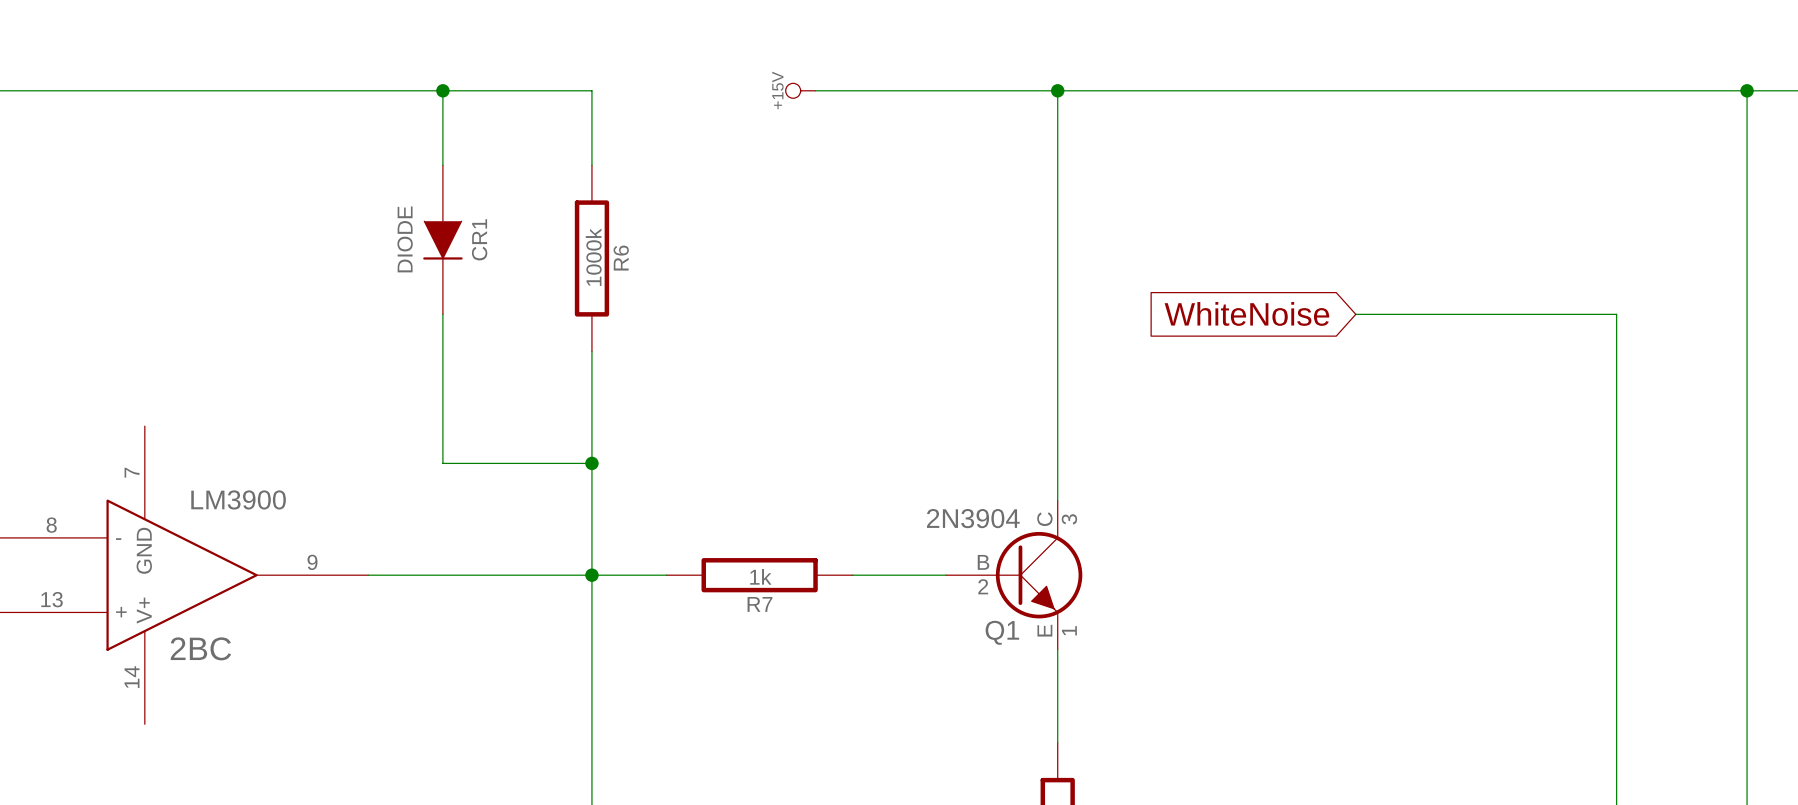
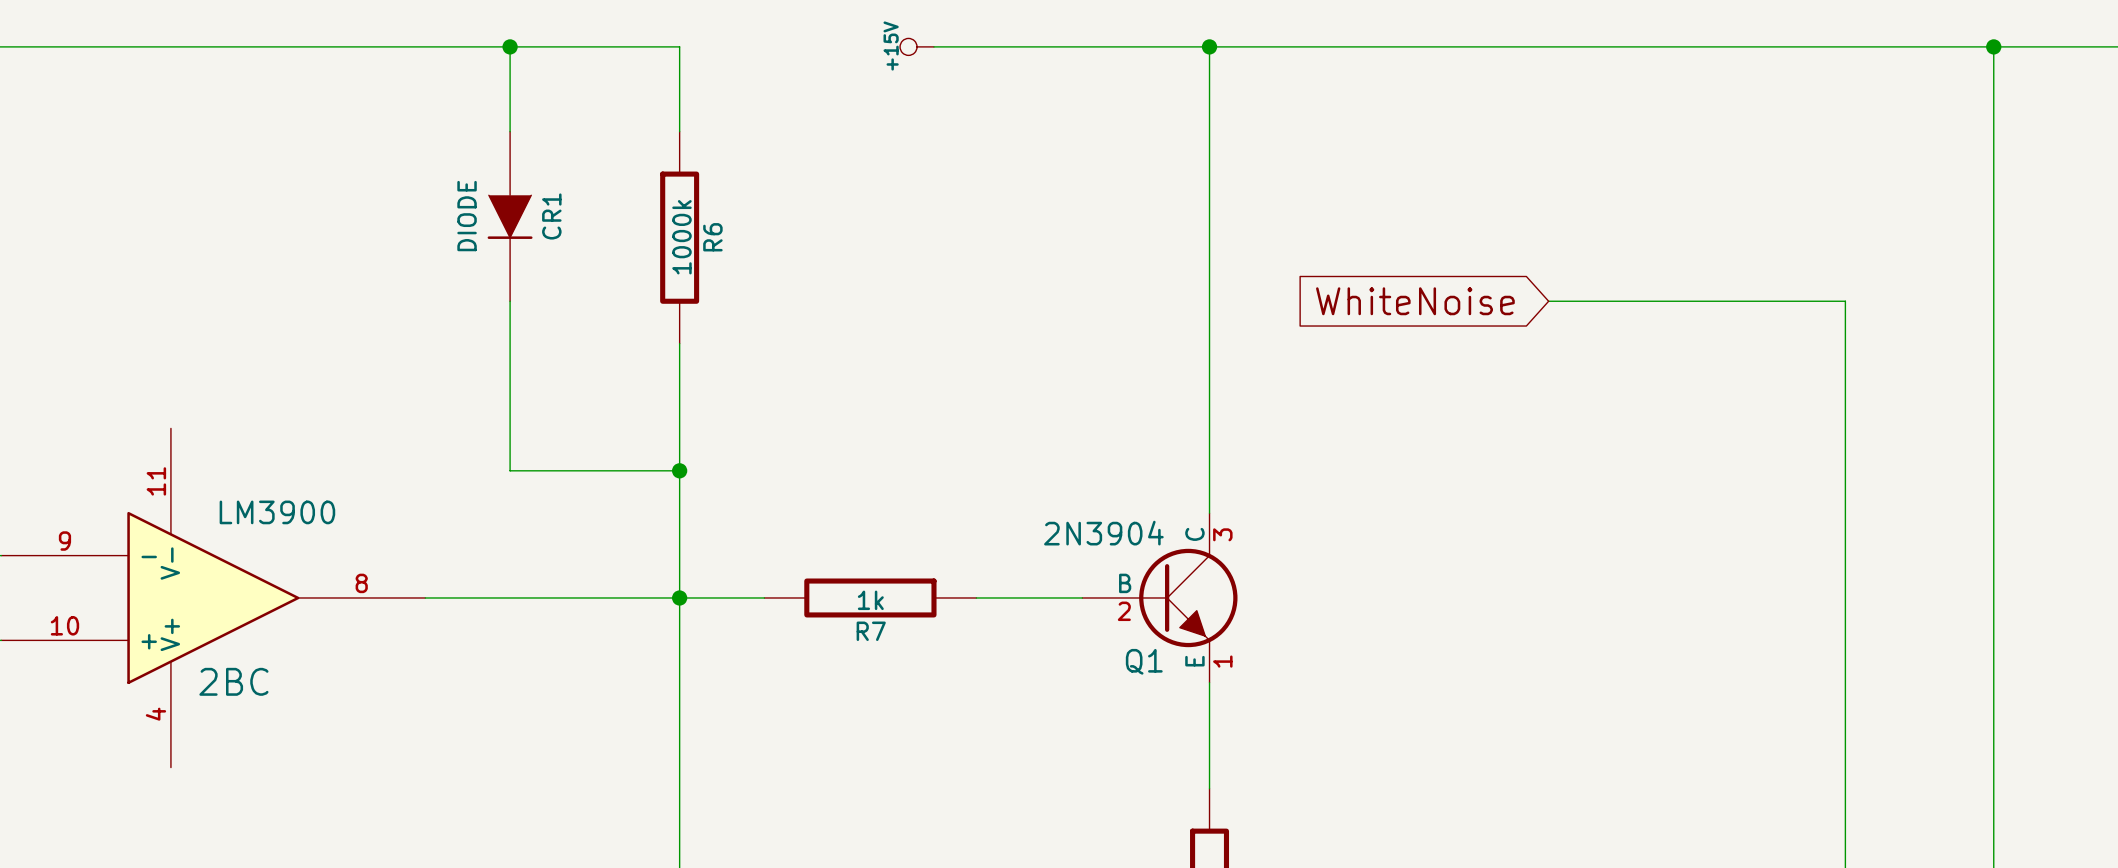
2BC pin number: 7 (132, 472) -> 11 (156, 481)
2BC pin number: 8 (51, 525) -> 9 (64, 541)
2BC pin name: GND (144, 550) -> V- (170, 563)
2BC pin number: 9 (312, 562) -> 8 (361, 583)
2BC pin number: 13 (52, 599) -> 10 (64, 625)
2BC pin number: 14 (132, 677) -> 4 (155, 714)

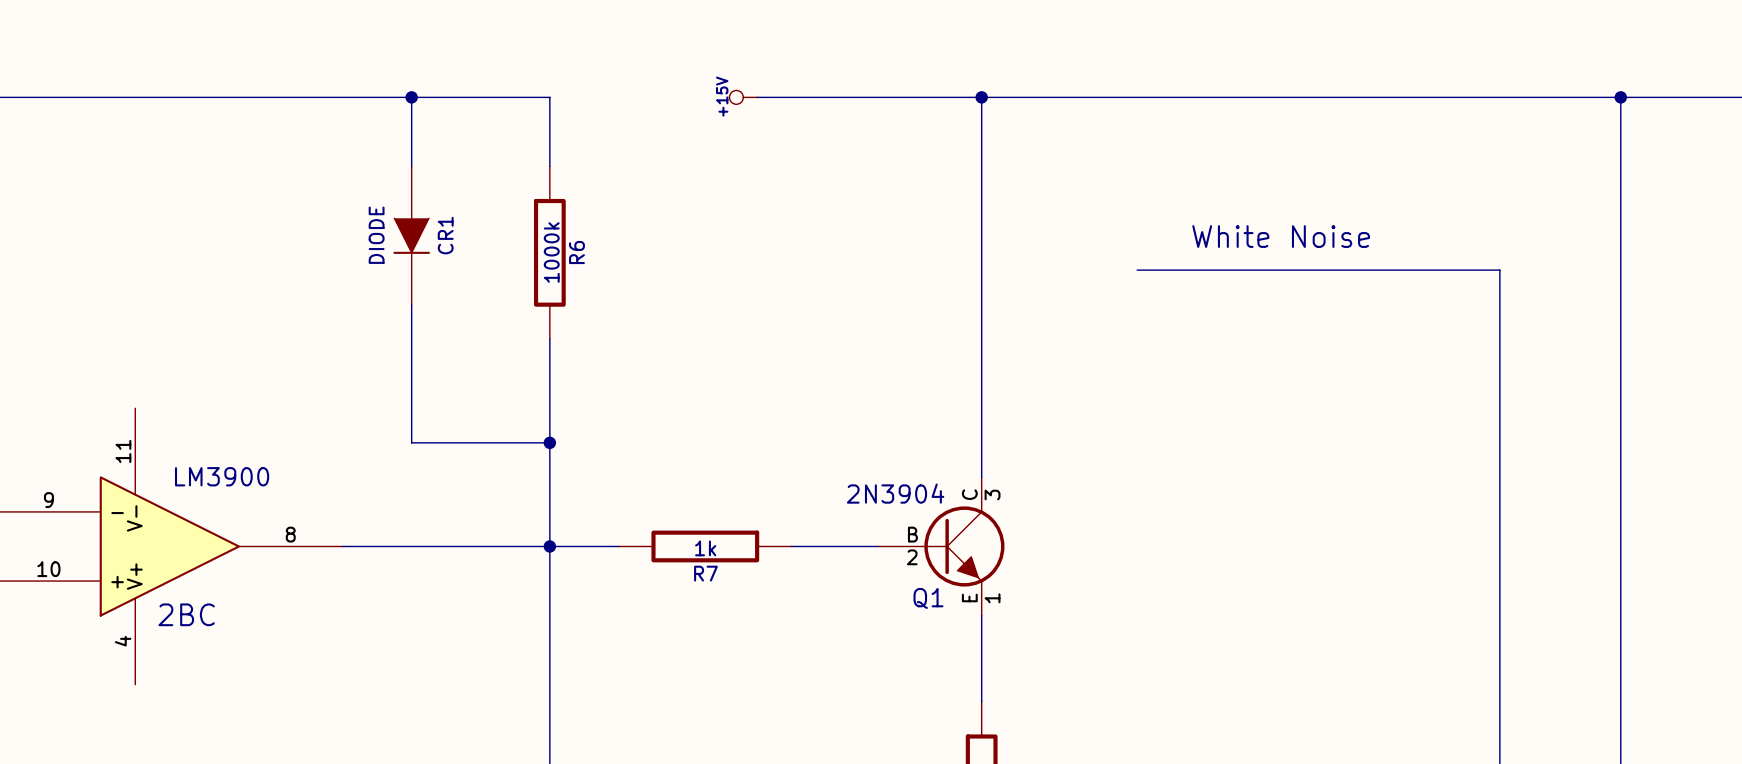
text: none -> White Noise (1281, 236)
global label: WhiteNoise (1415, 301) -> none
wire: (1548, 301) (1845, 301) -> (1137, 270) (1499, 270) (1499, 304)

